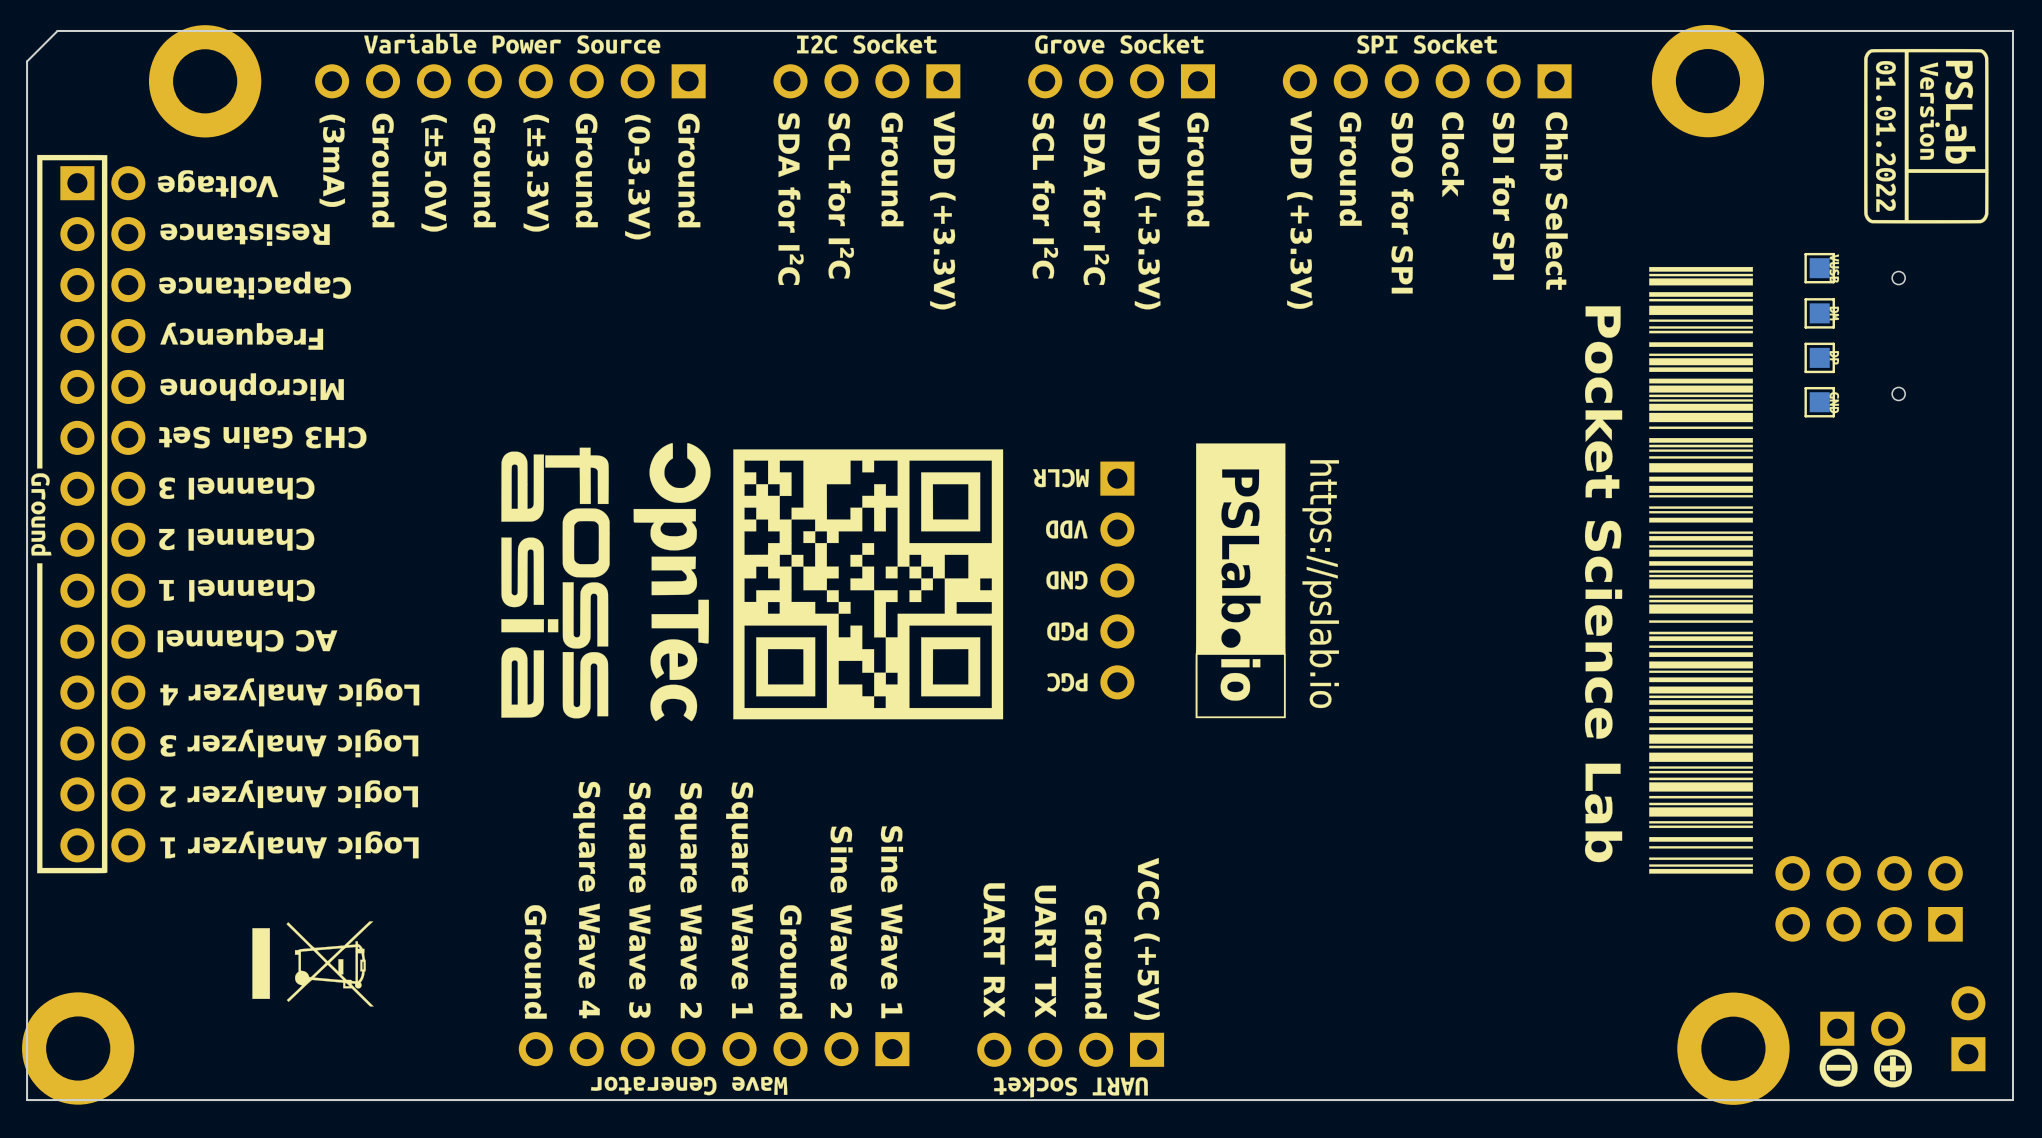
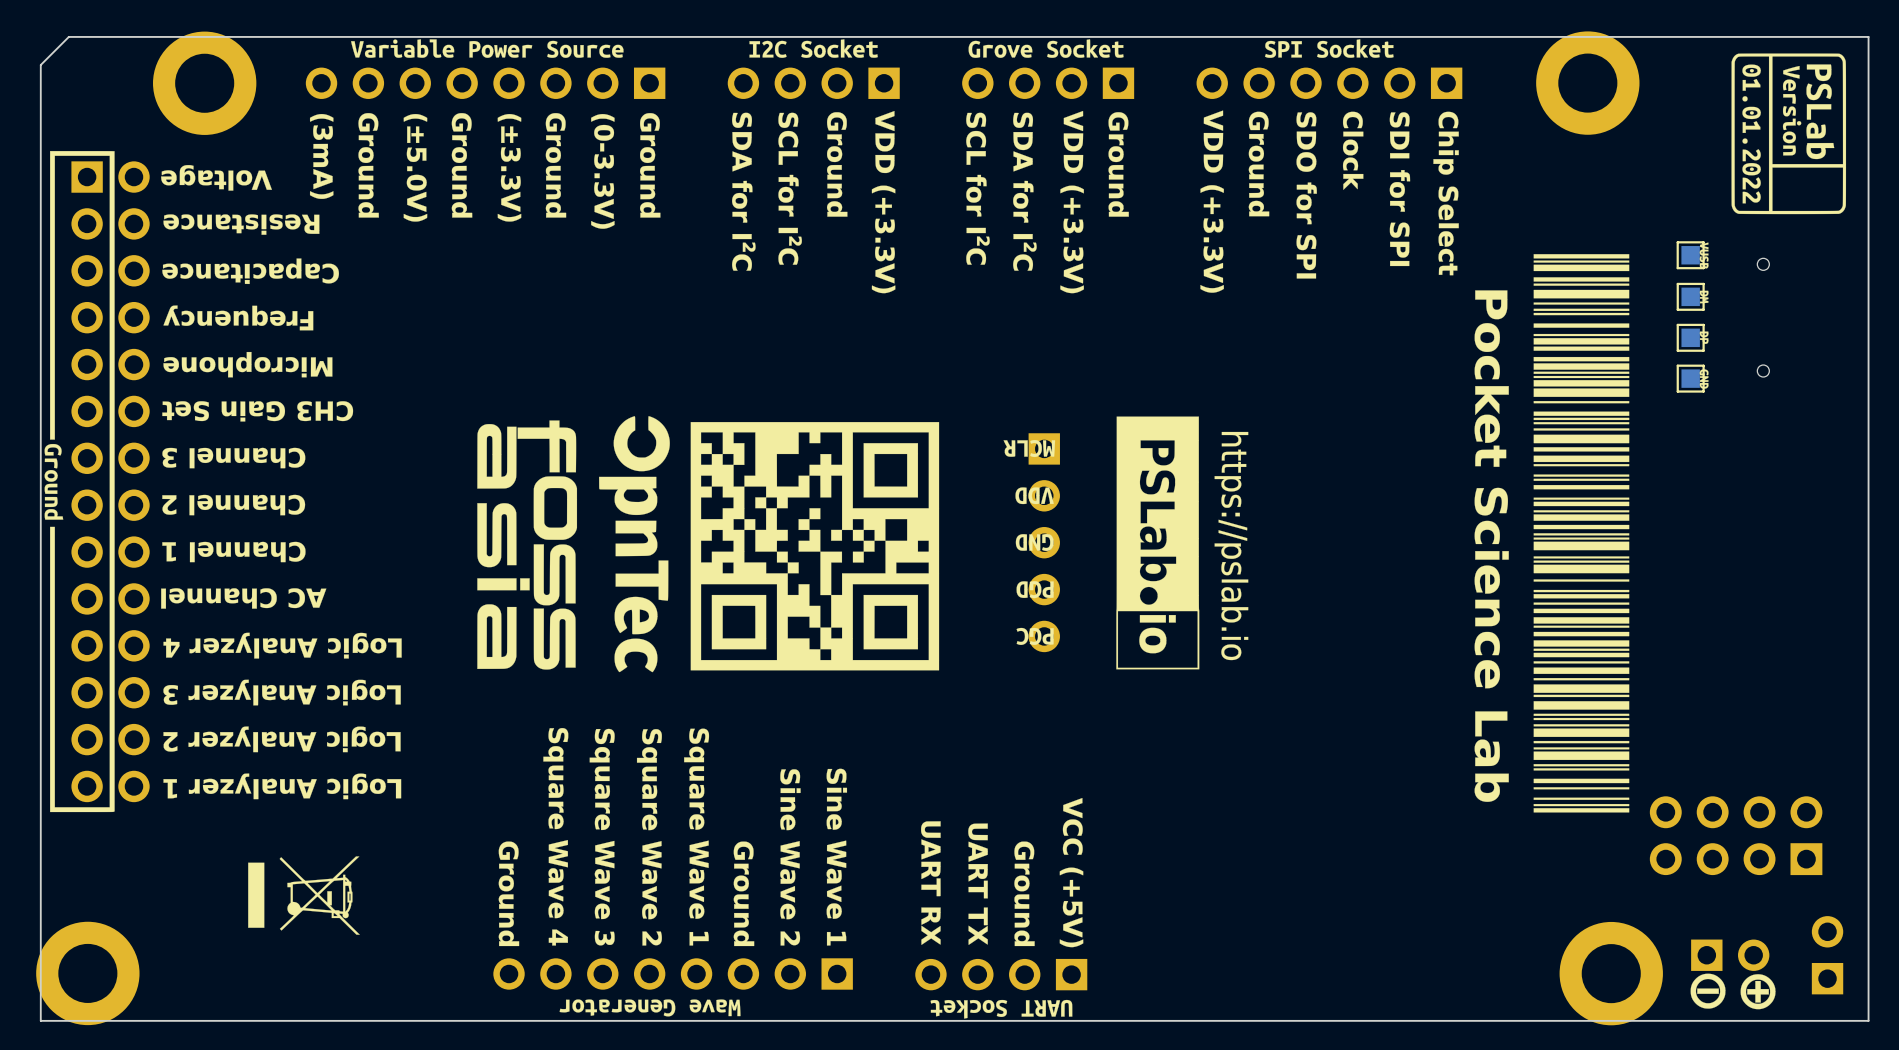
drawing shape: [31, 33, 1989, 1098] -> [44, 39, 1847, 1019]

